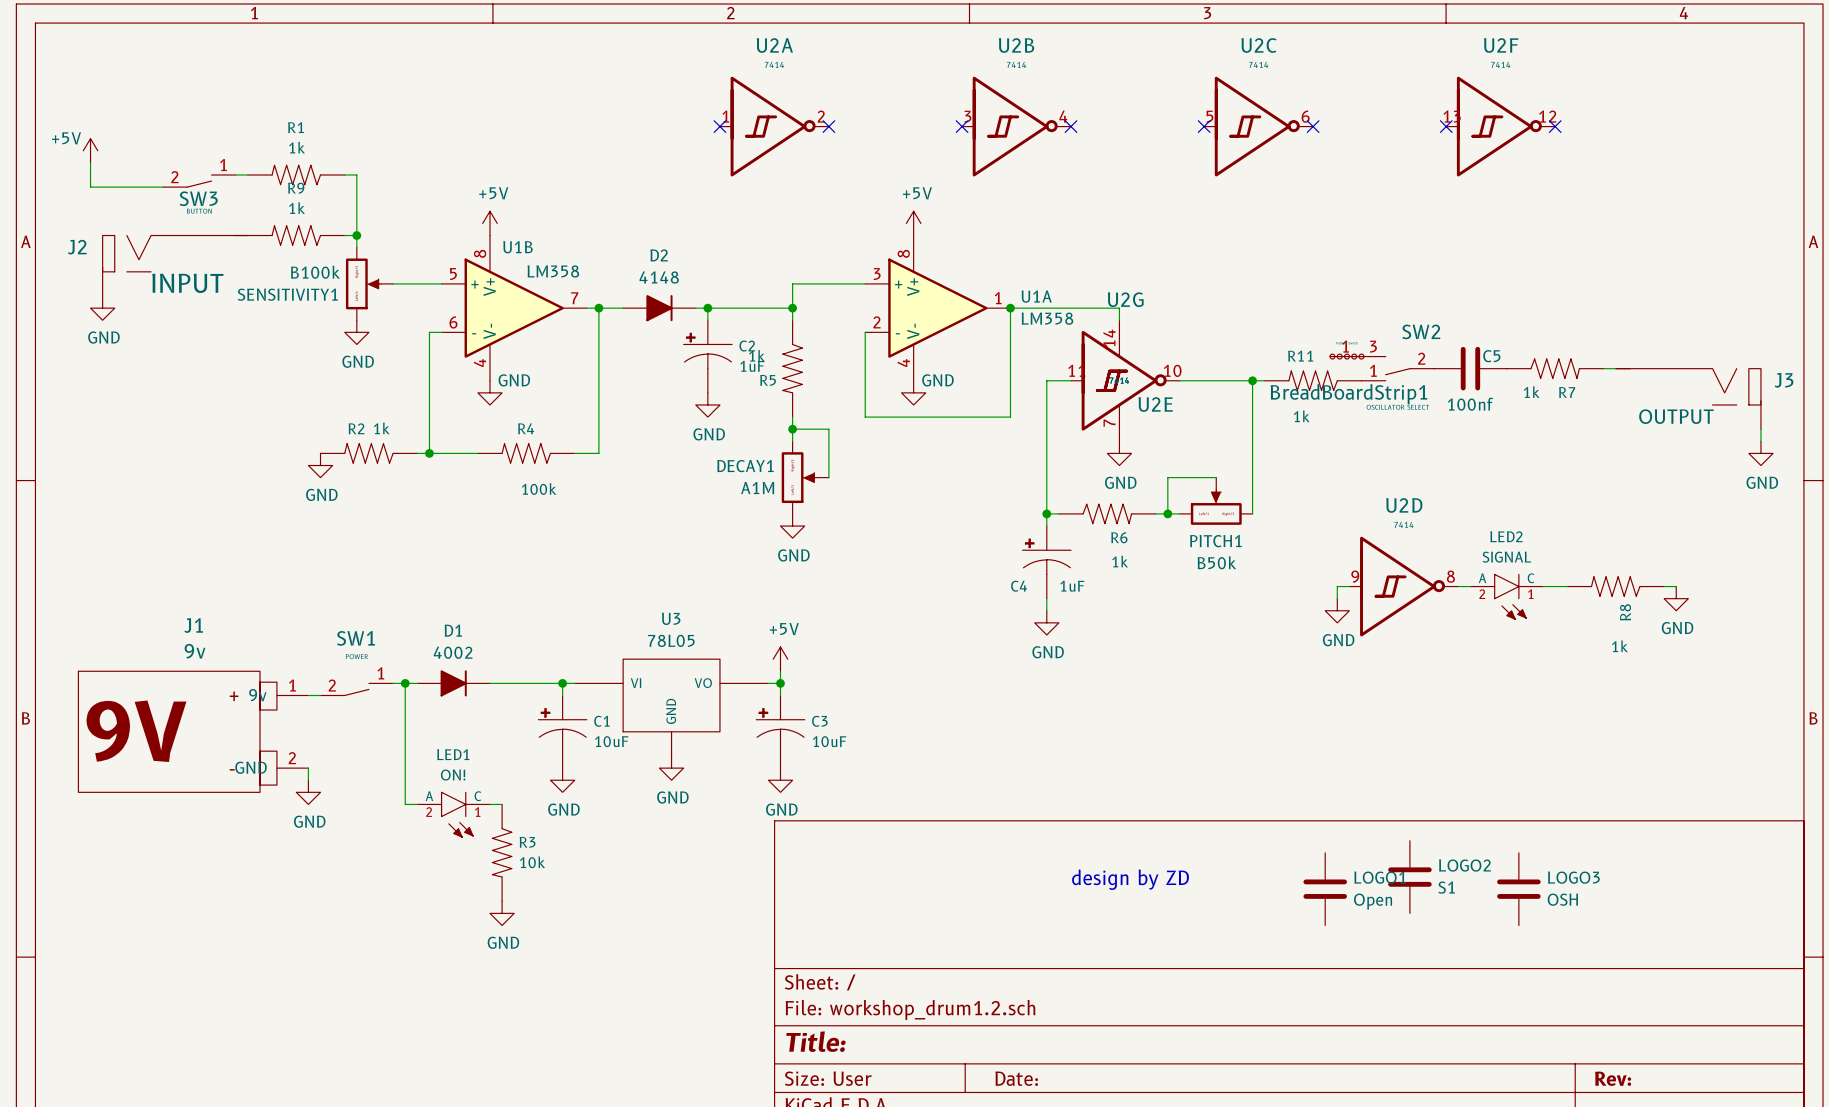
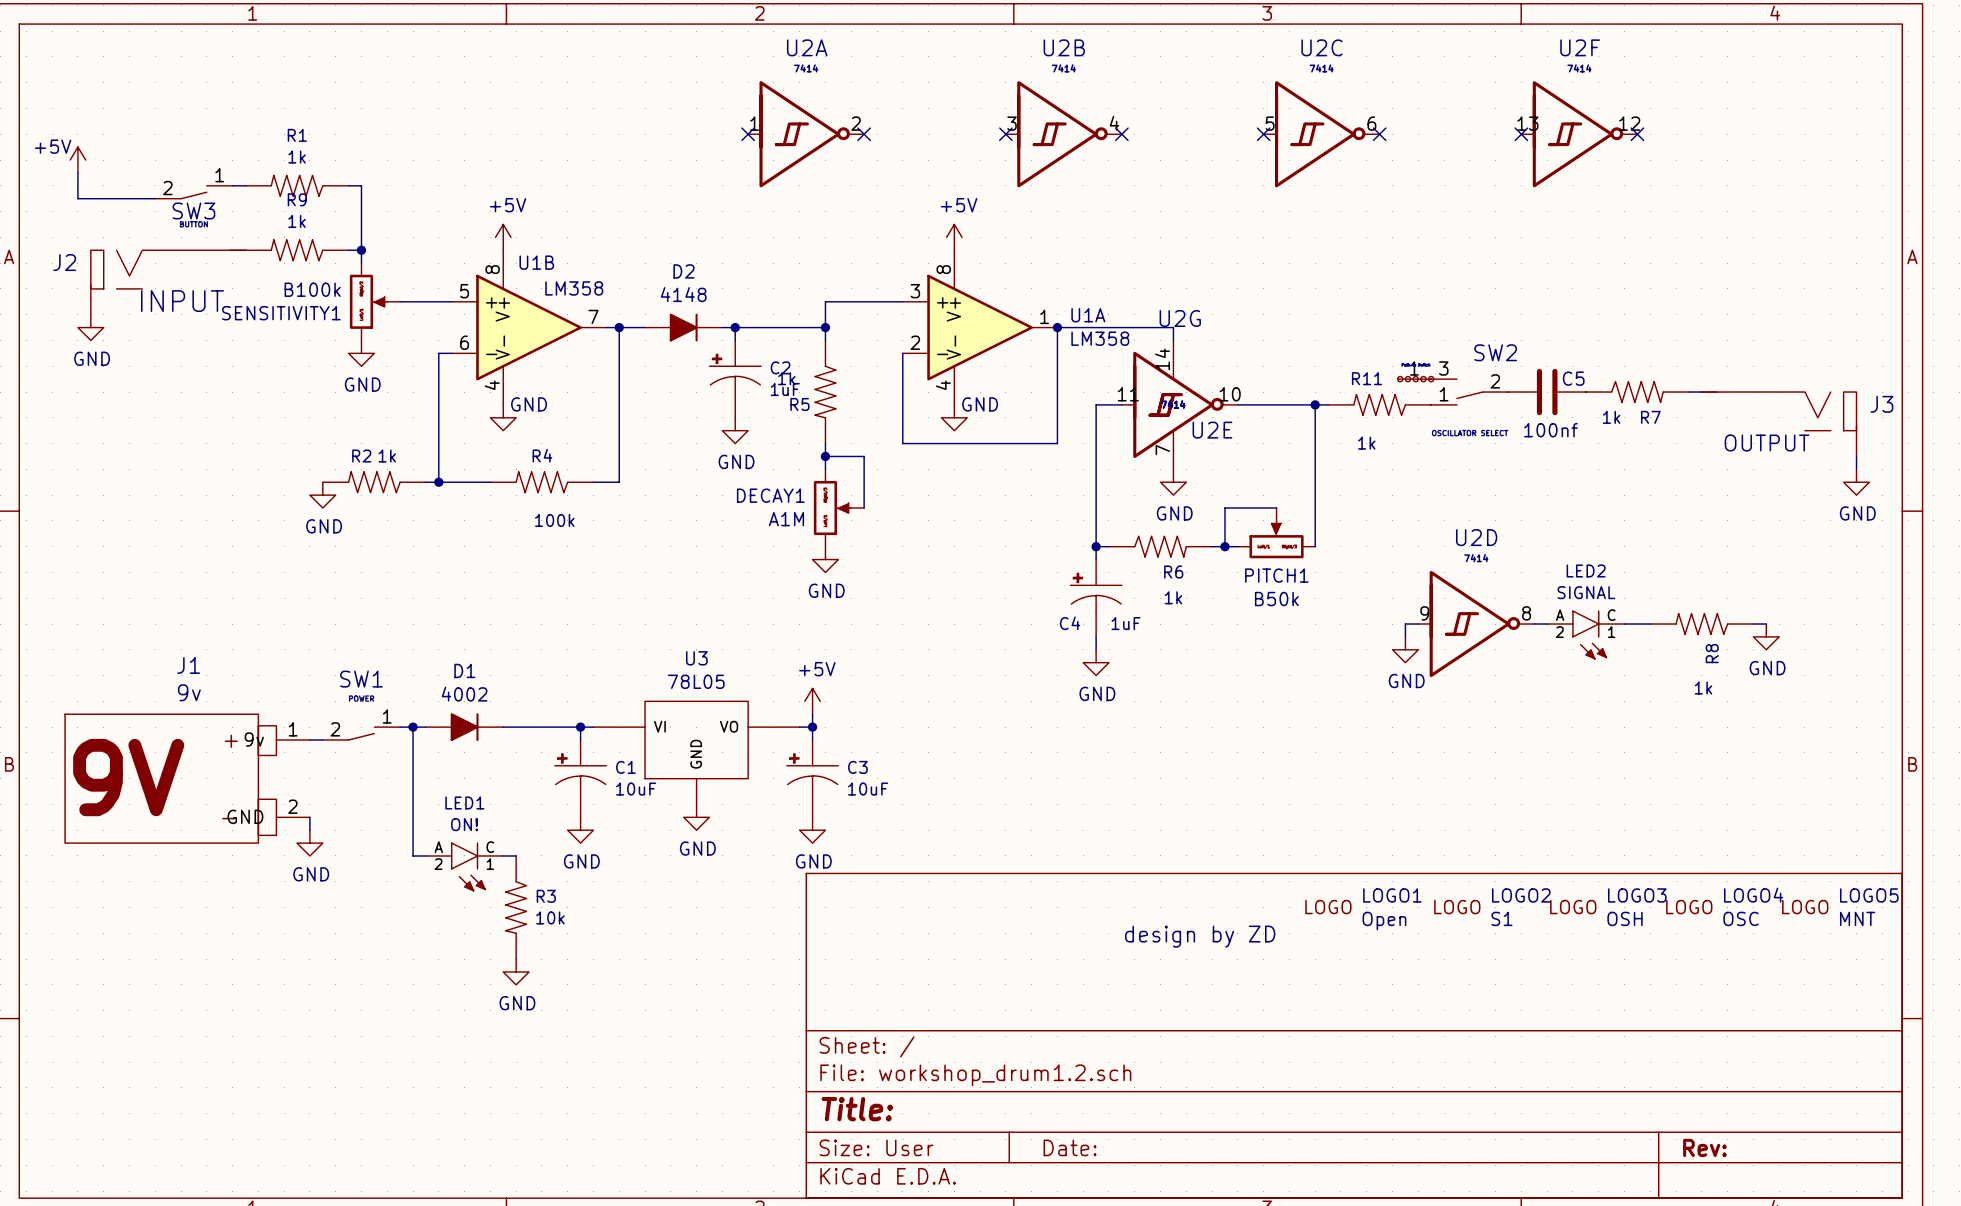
BreadBoardStrip1 name: BreadBoardStrip1 (1348, 394) -> none
LOGO2 symbol: [1388, 840, 1432, 914] -> [1434, 888, 1551, 927]
LOGO1 symbol: [1303, 852, 1347, 926] -> [1305, 888, 1422, 931]
LOGO3 symbol: [1497, 852, 1541, 926] -> [1550, 888, 1667, 927]
LOGO4: none -> OSC (1724, 906)
LOGO5: none -> MNT (1840, 907)
LOGO2 name position: LOGO2 (1464, 865) -> LOGO2 (1521, 895)
LOGO1 name position: LOGO1 (1380, 877) -> LOGO1 (1392, 895)
LOGO3 name position: LOGO3 (1573, 877) -> LOGO3 (1637, 895)
LOGO2 value position: S1 (1446, 887) -> S1 (1501, 918)
LOGO3 value position: OSH (1562, 899) -> OSH (1625, 918)
LOGO1 value position: Open (1373, 901) -> Open (1384, 921)

